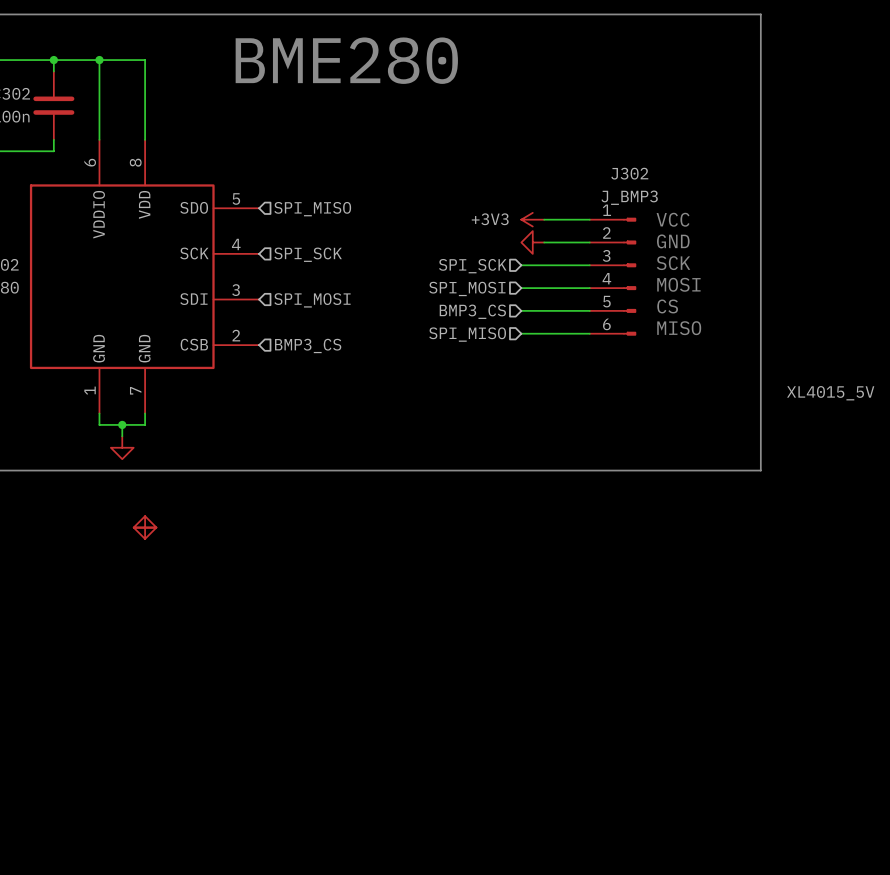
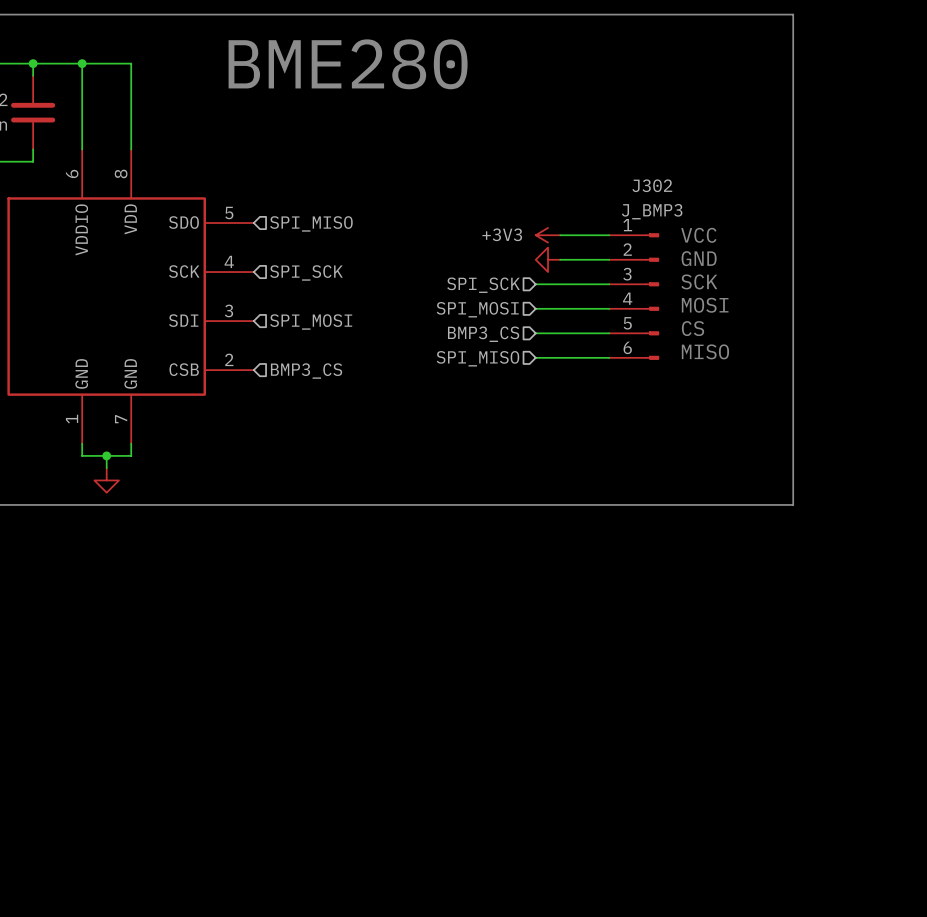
label: XL4015_5V (830, 393) -> none
power symbol: (145, 527) -> none
power symbol: (145, 527) -> none

